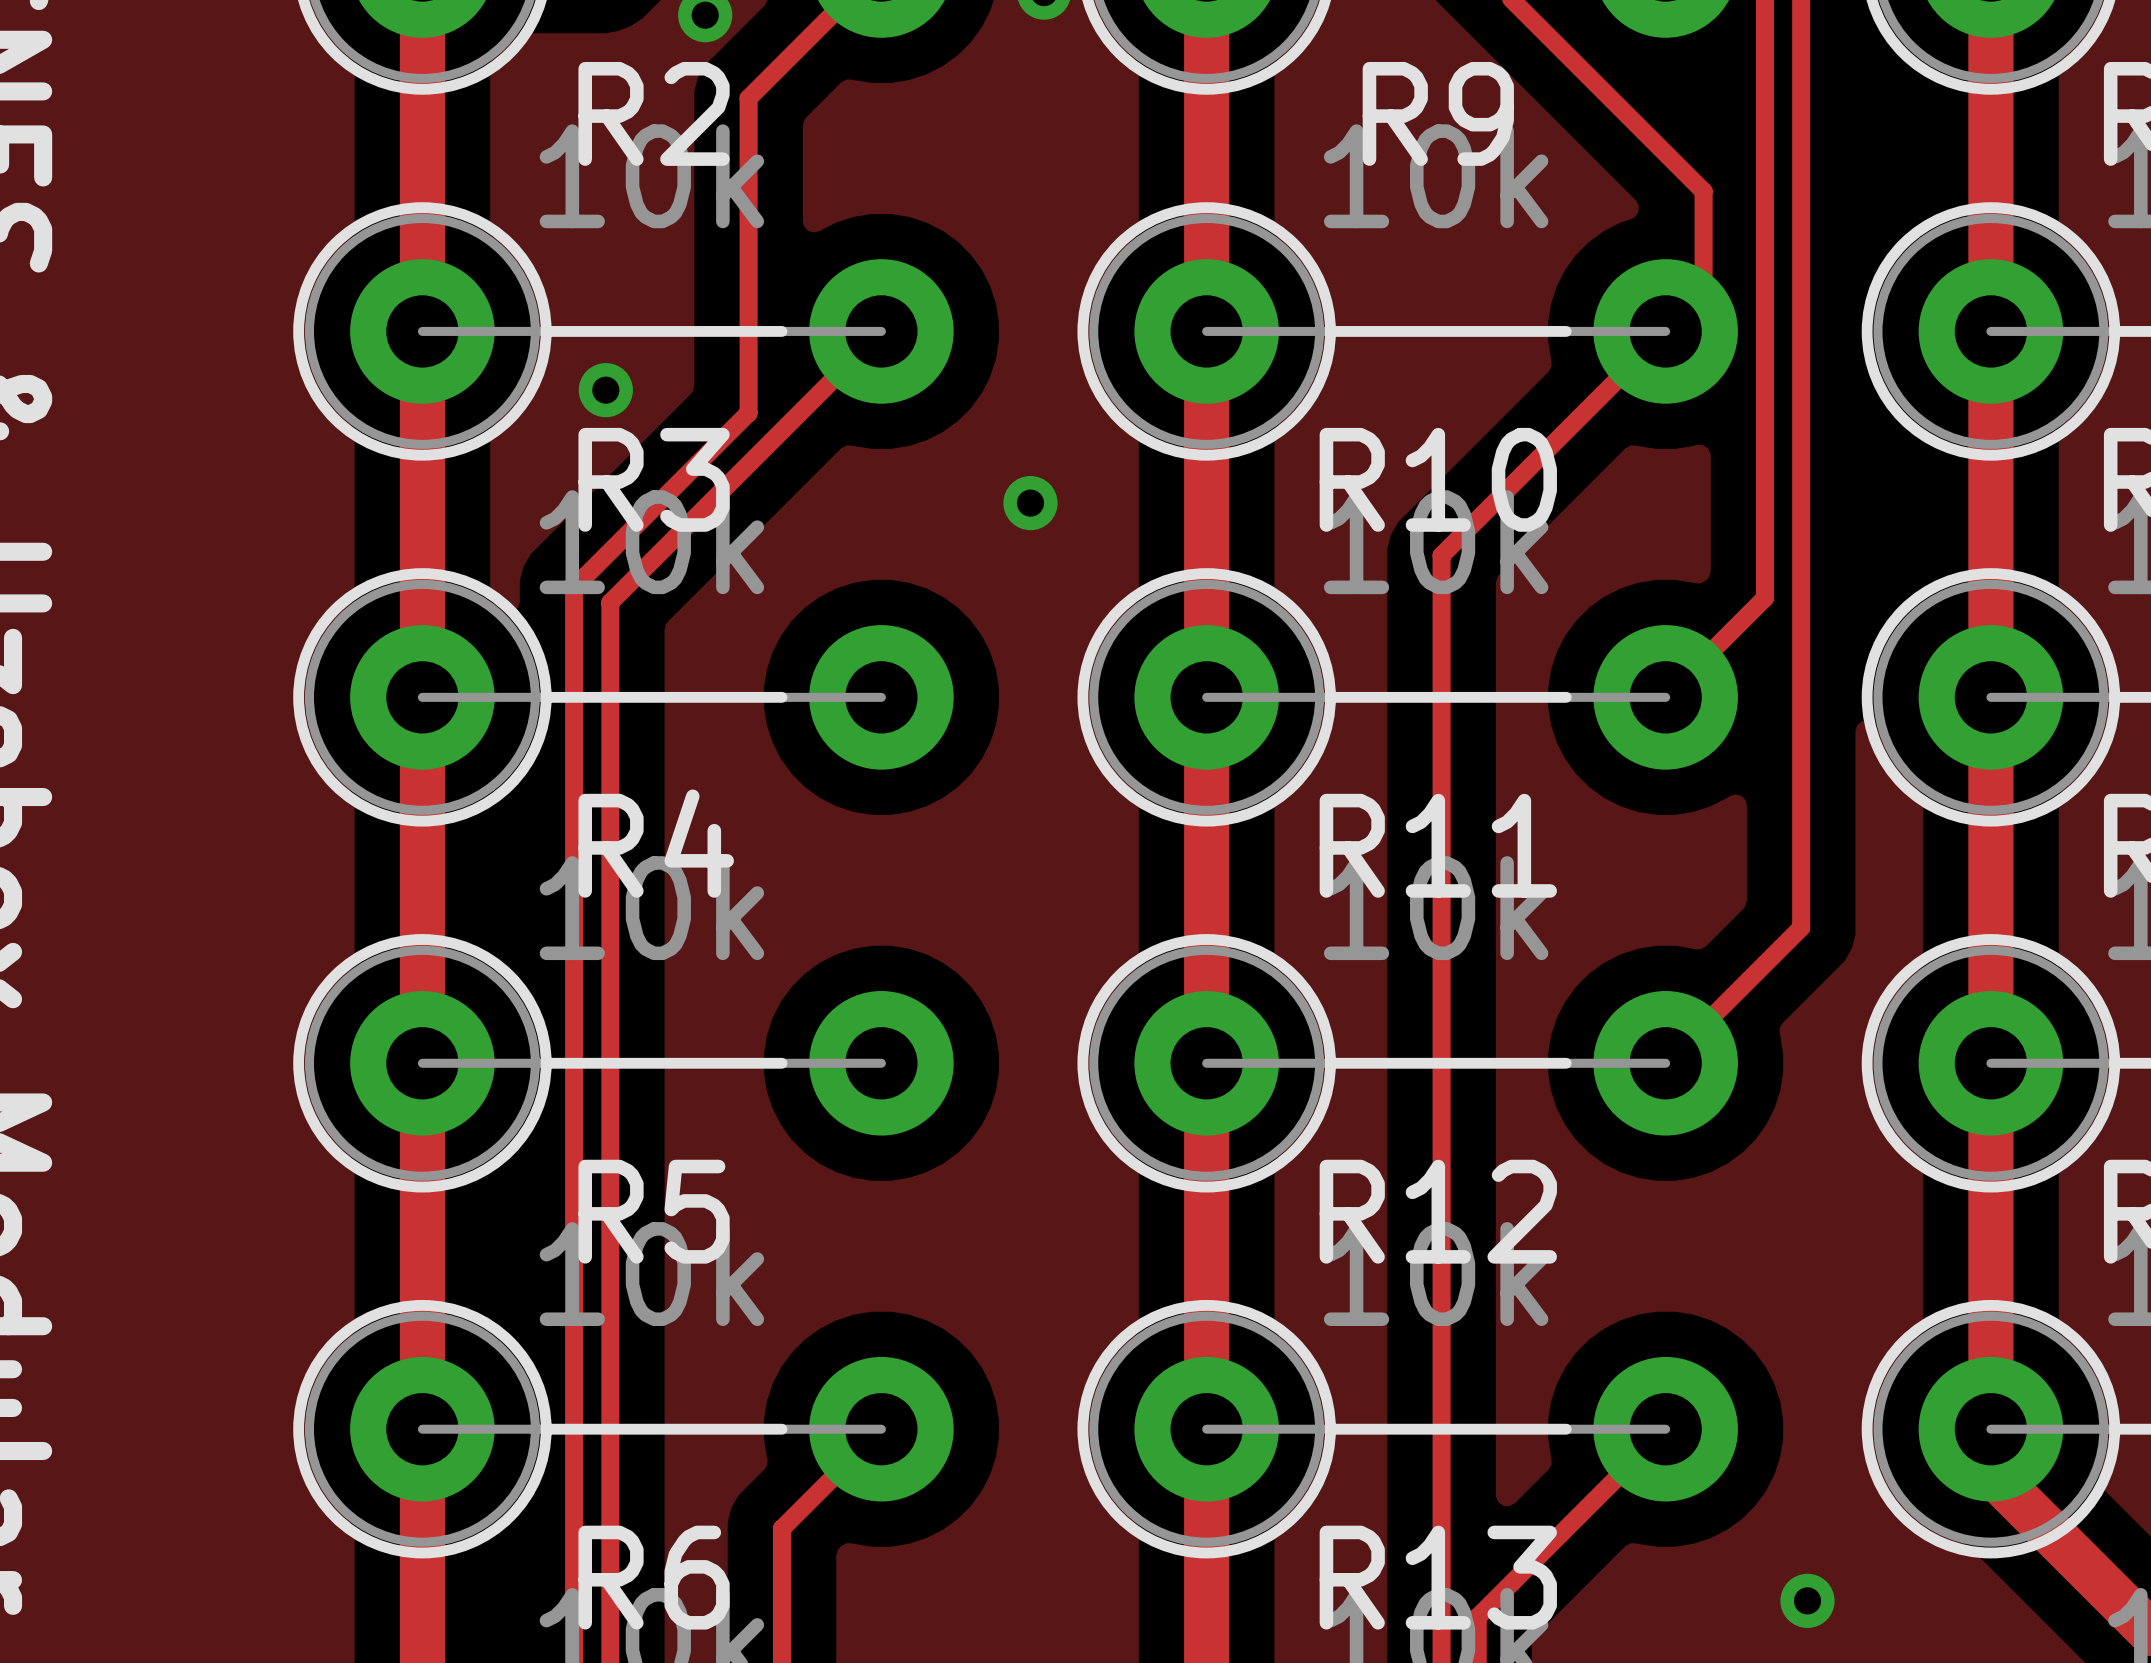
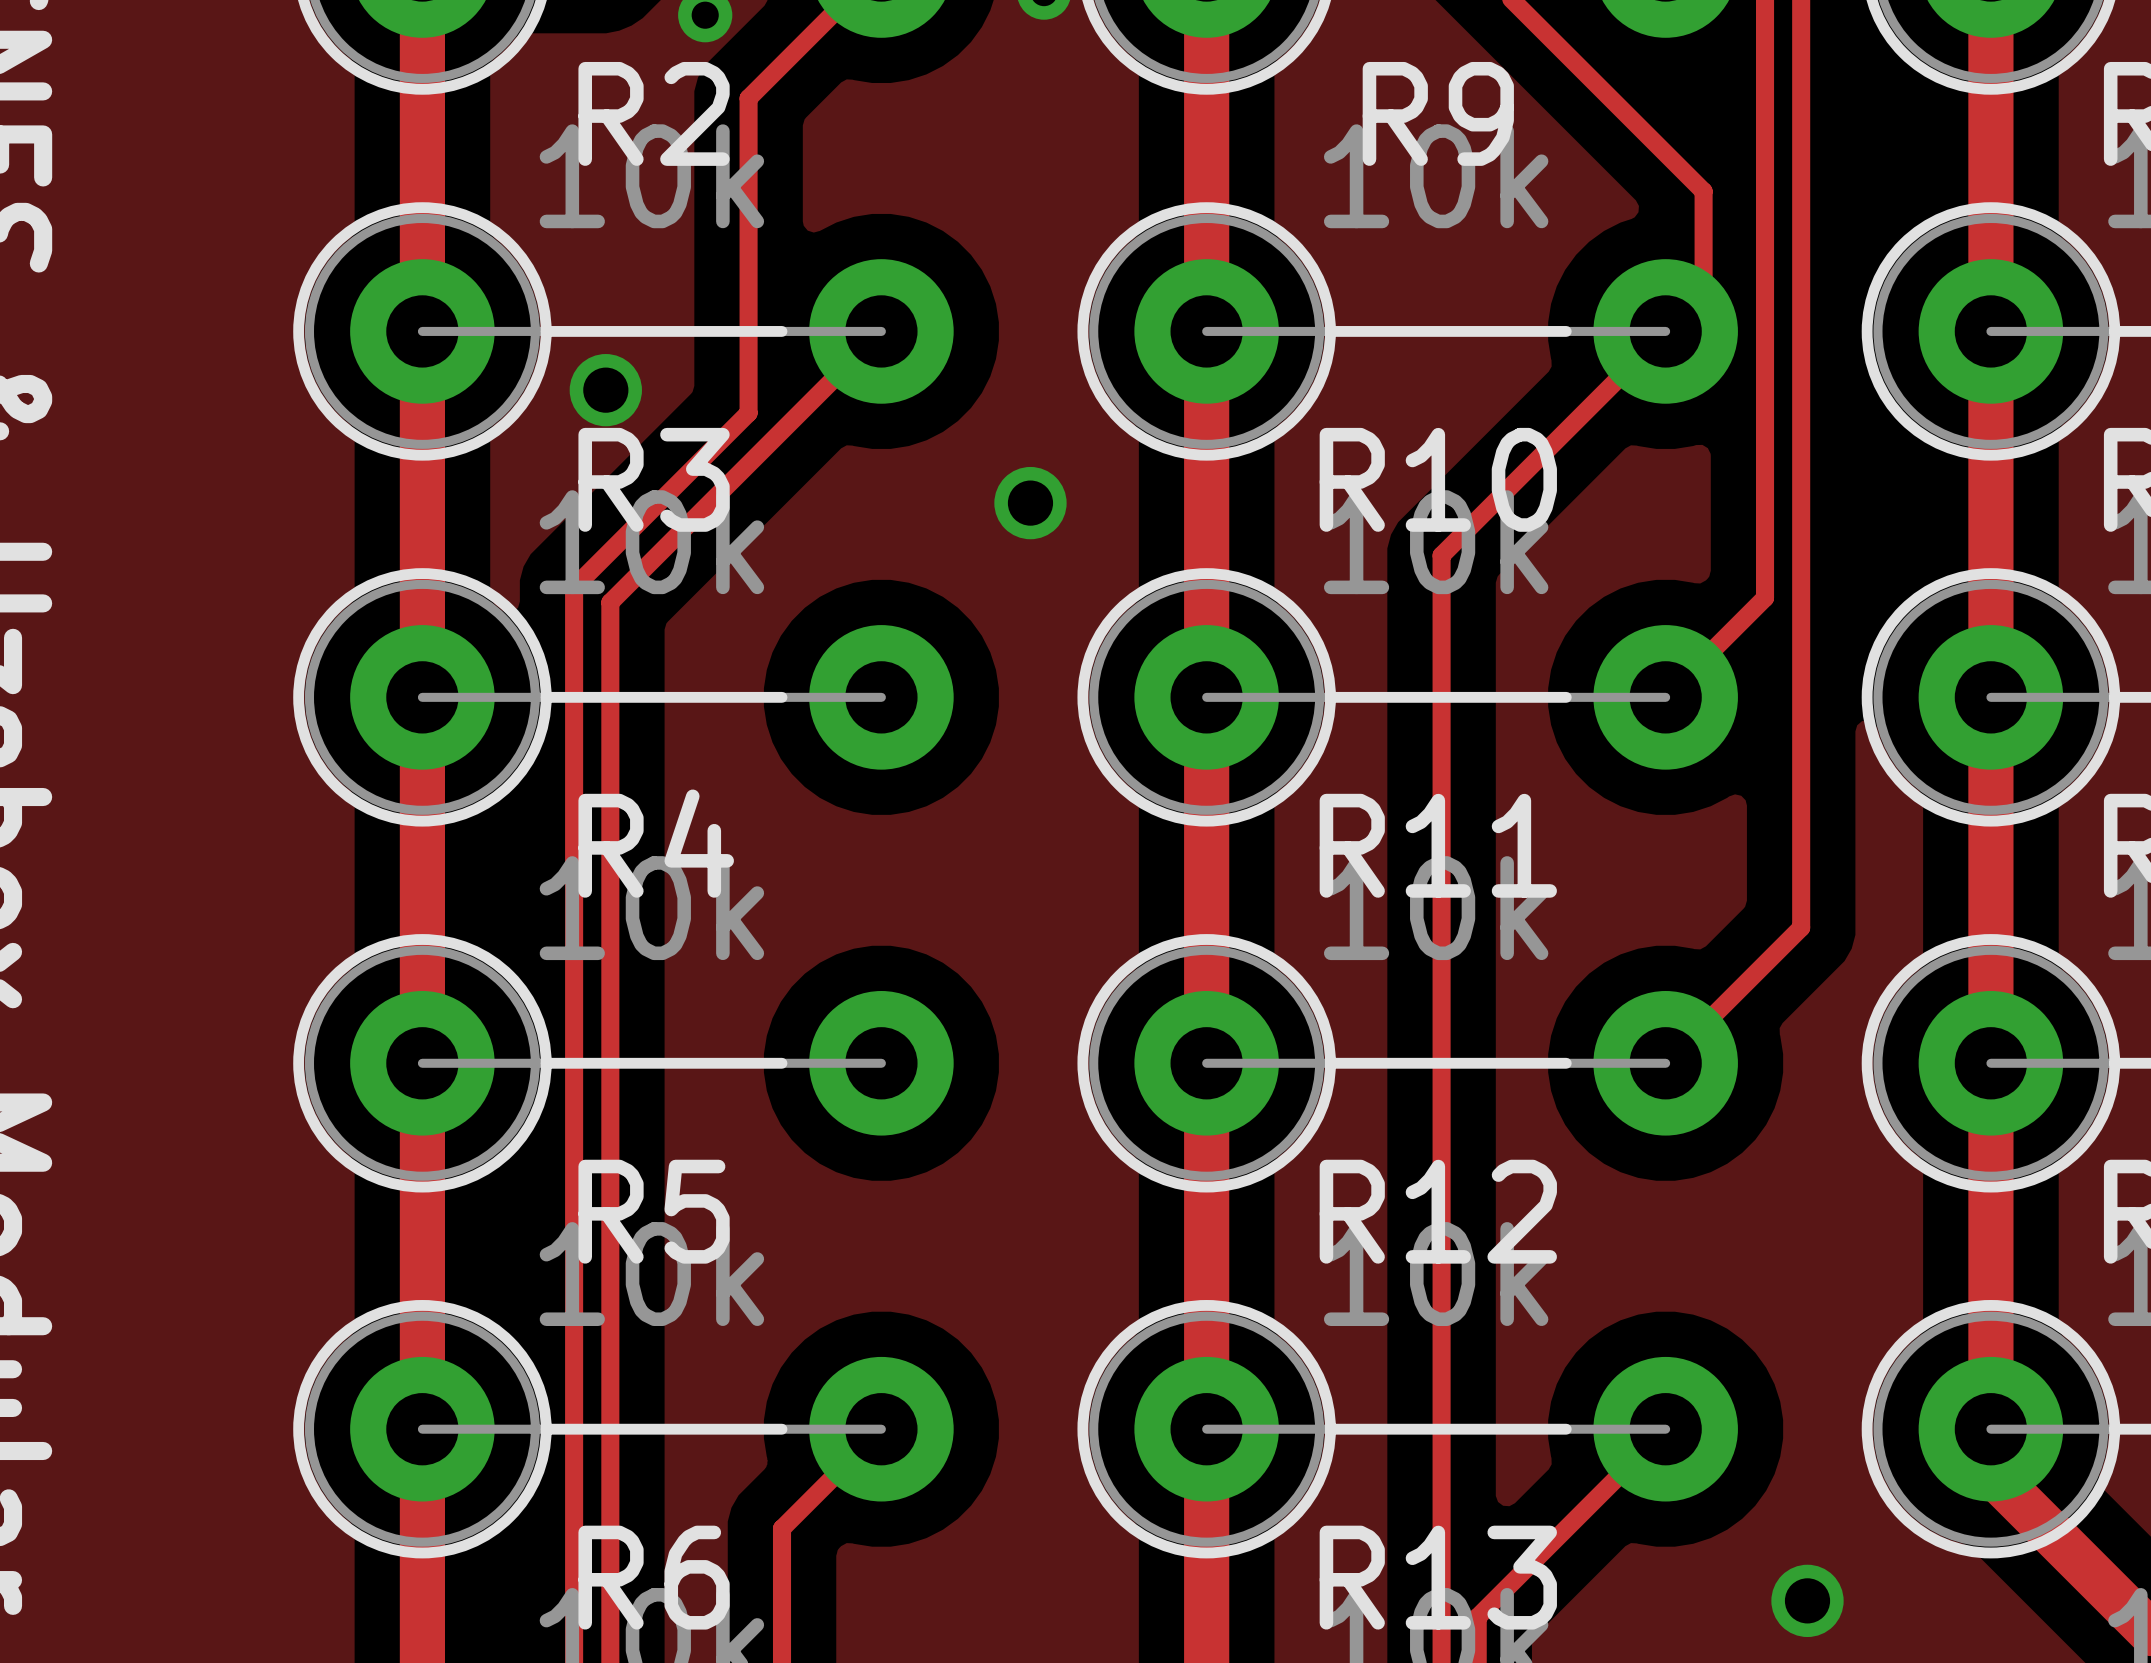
via size: [578, 363, 633, 418] -> [569, 354, 642, 427]
via size: [1003, 475, 1058, 531] -> [994, 466, 1067, 540]
via size: [1780, 1573, 1835, 1628] -> [1771, 1564, 1844, 1638]

